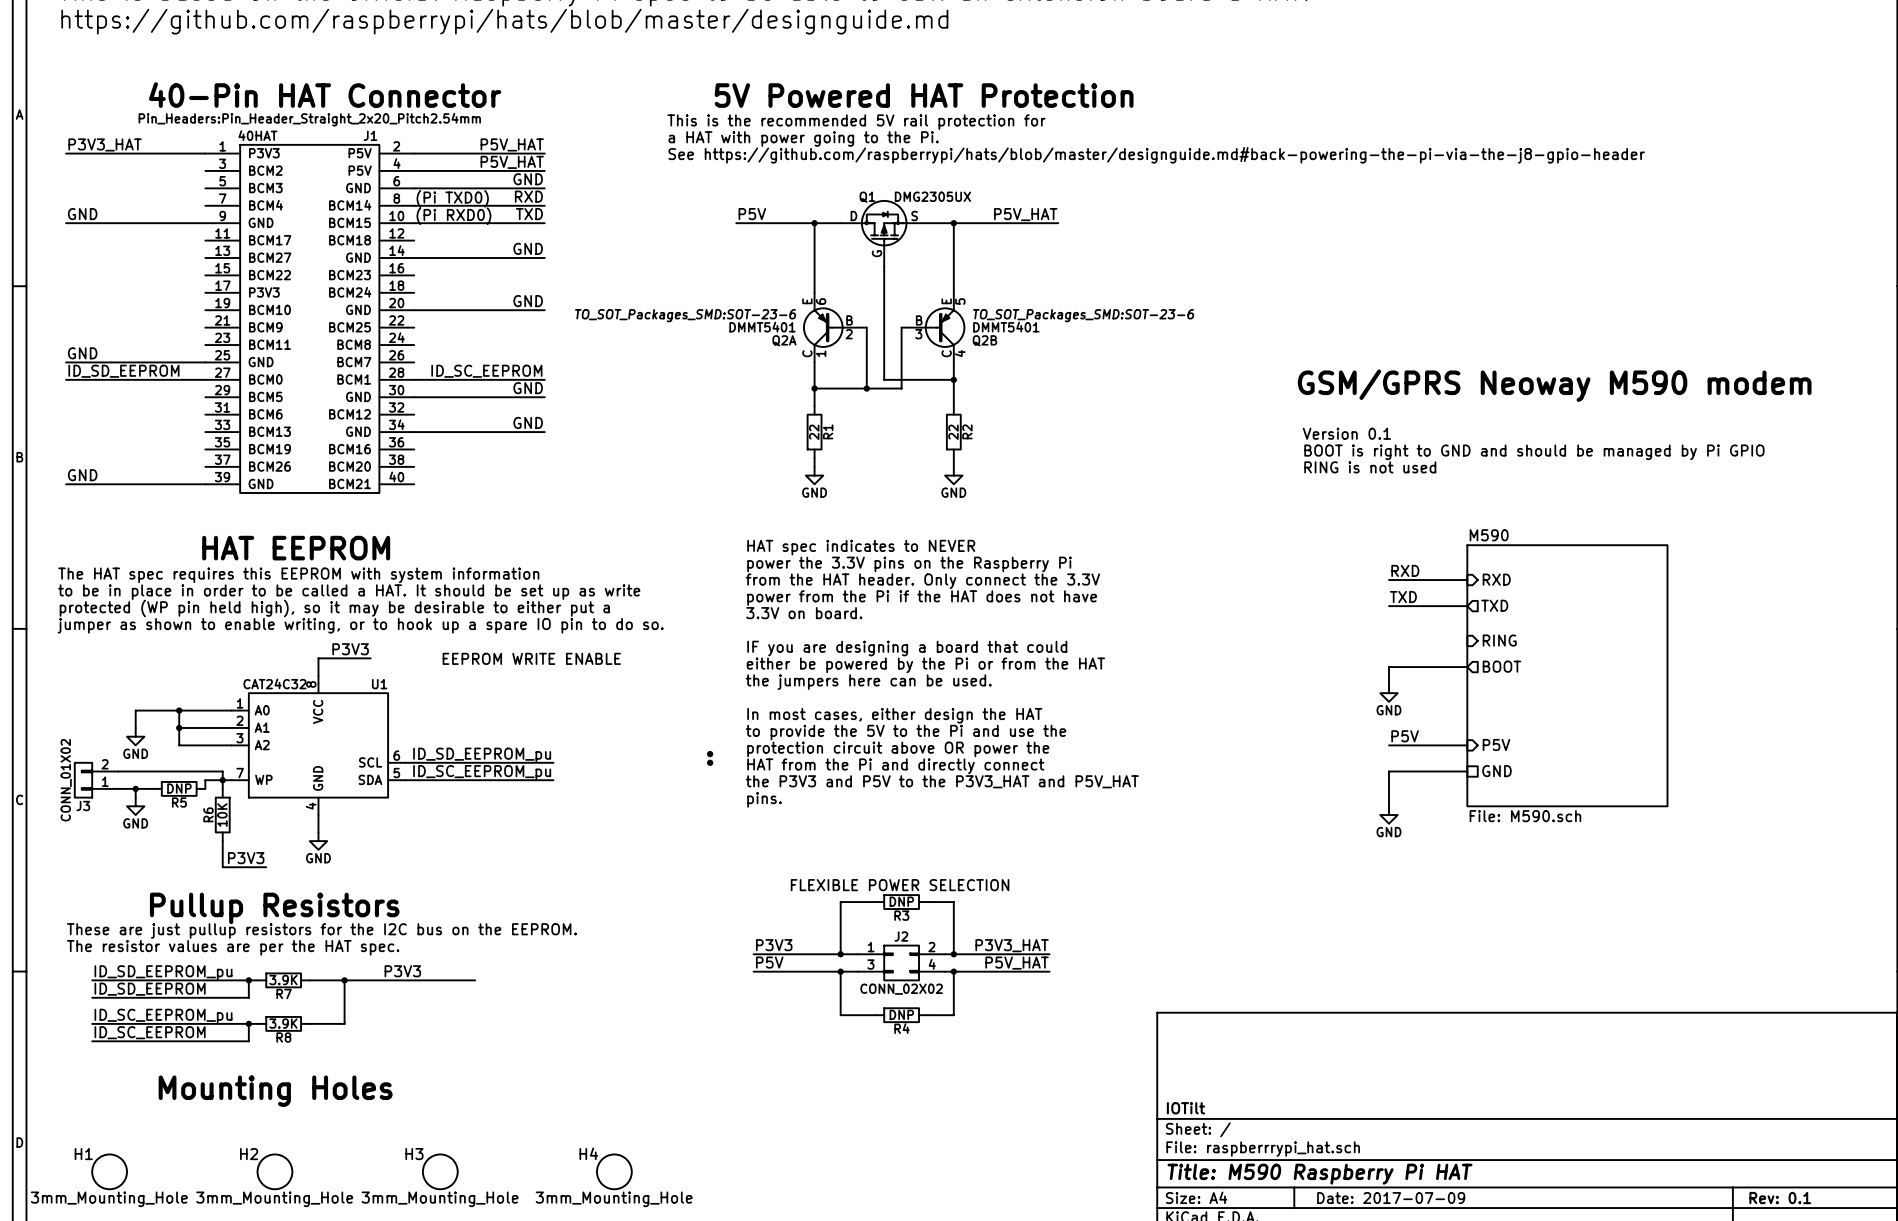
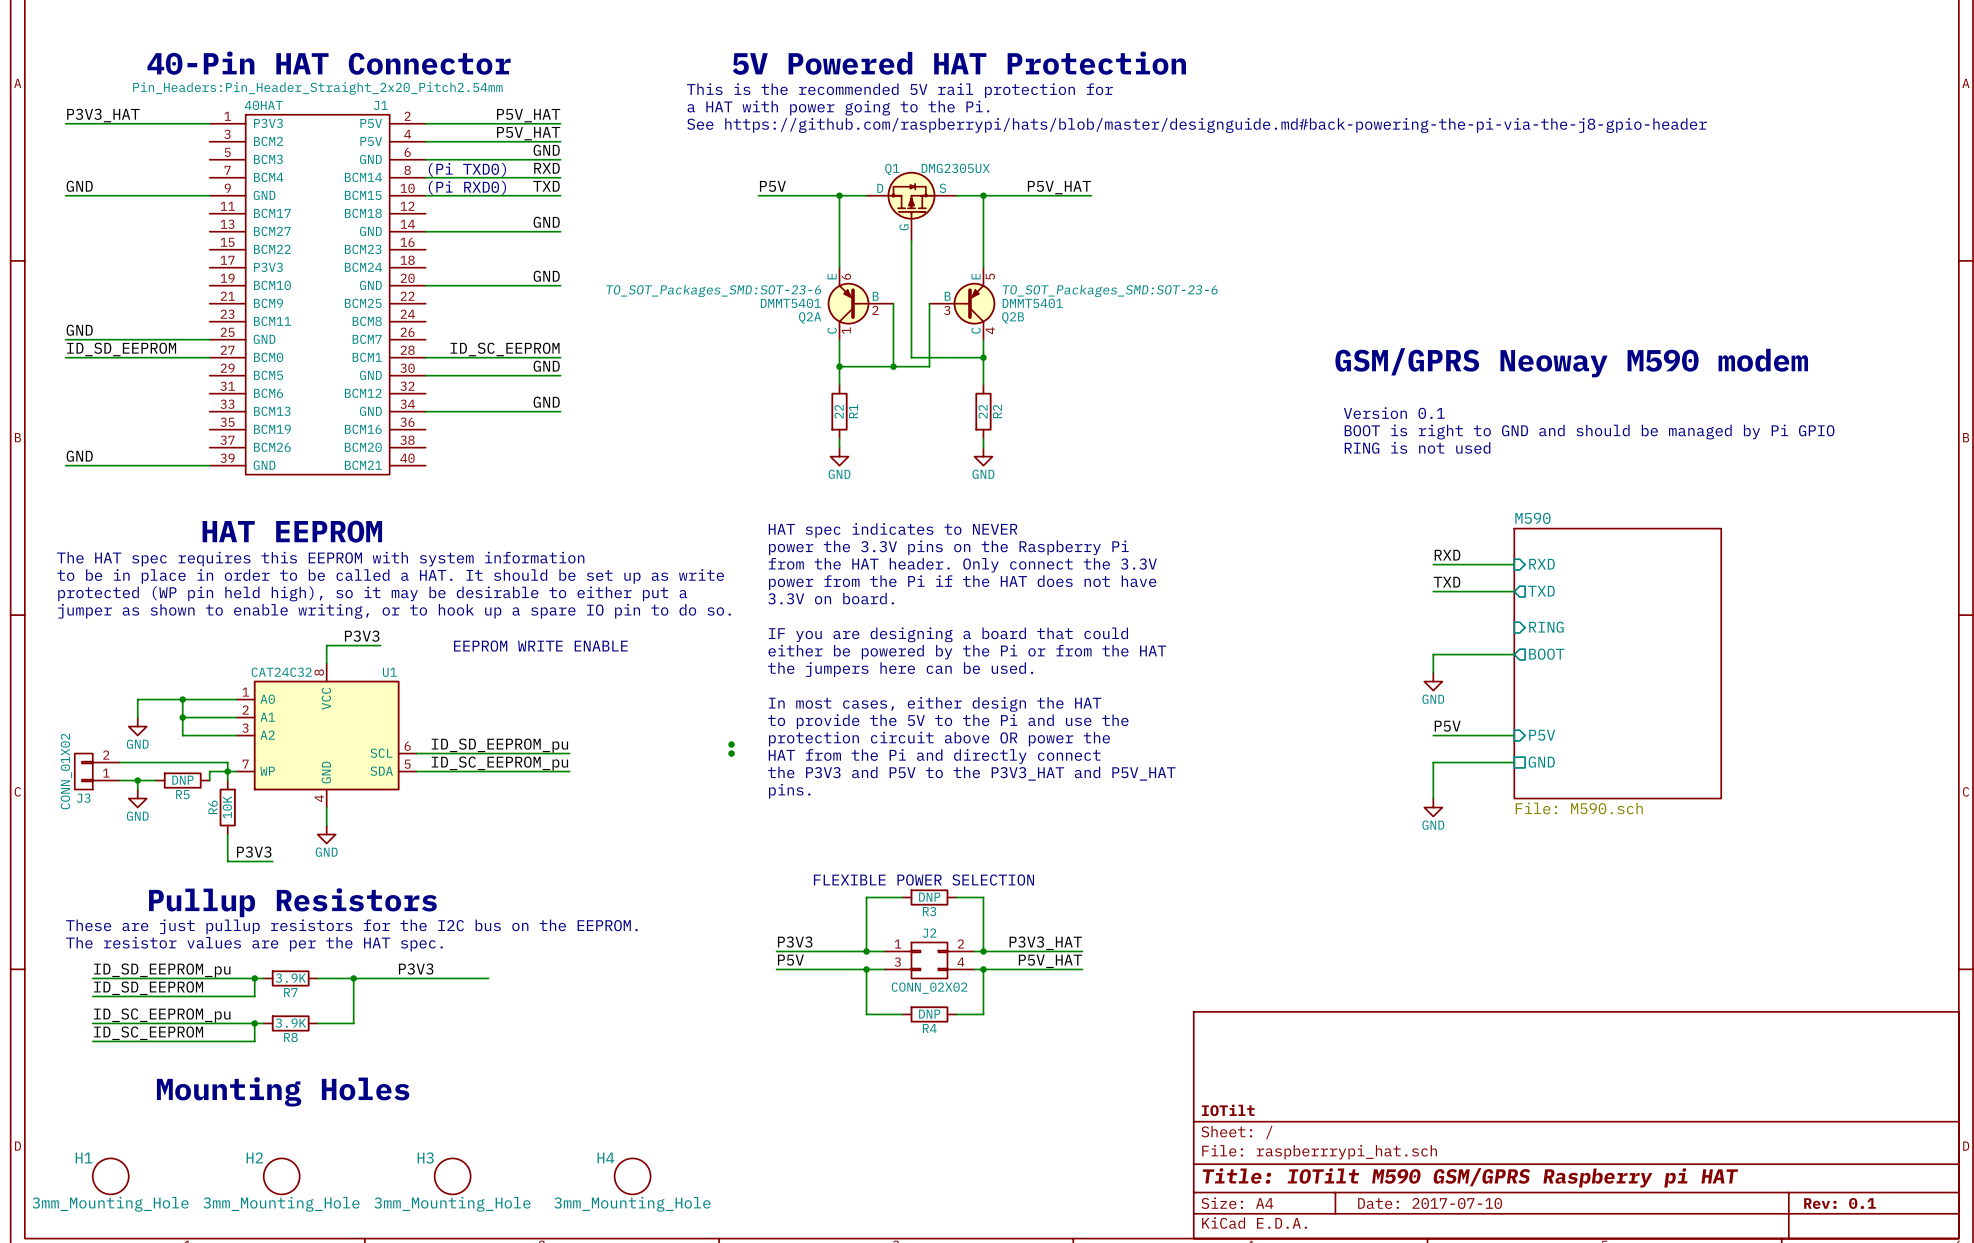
title block: Title: M590 Raspberry Pi HAT (1320, 1174) -> Title: IOTilt M590 GSM/GPRS Raspberry pi HAT (1470, 1177)
title block: Date: 2017-07-09 (1391, 1198) -> Date: 2017-07-10 (1430, 1203)

